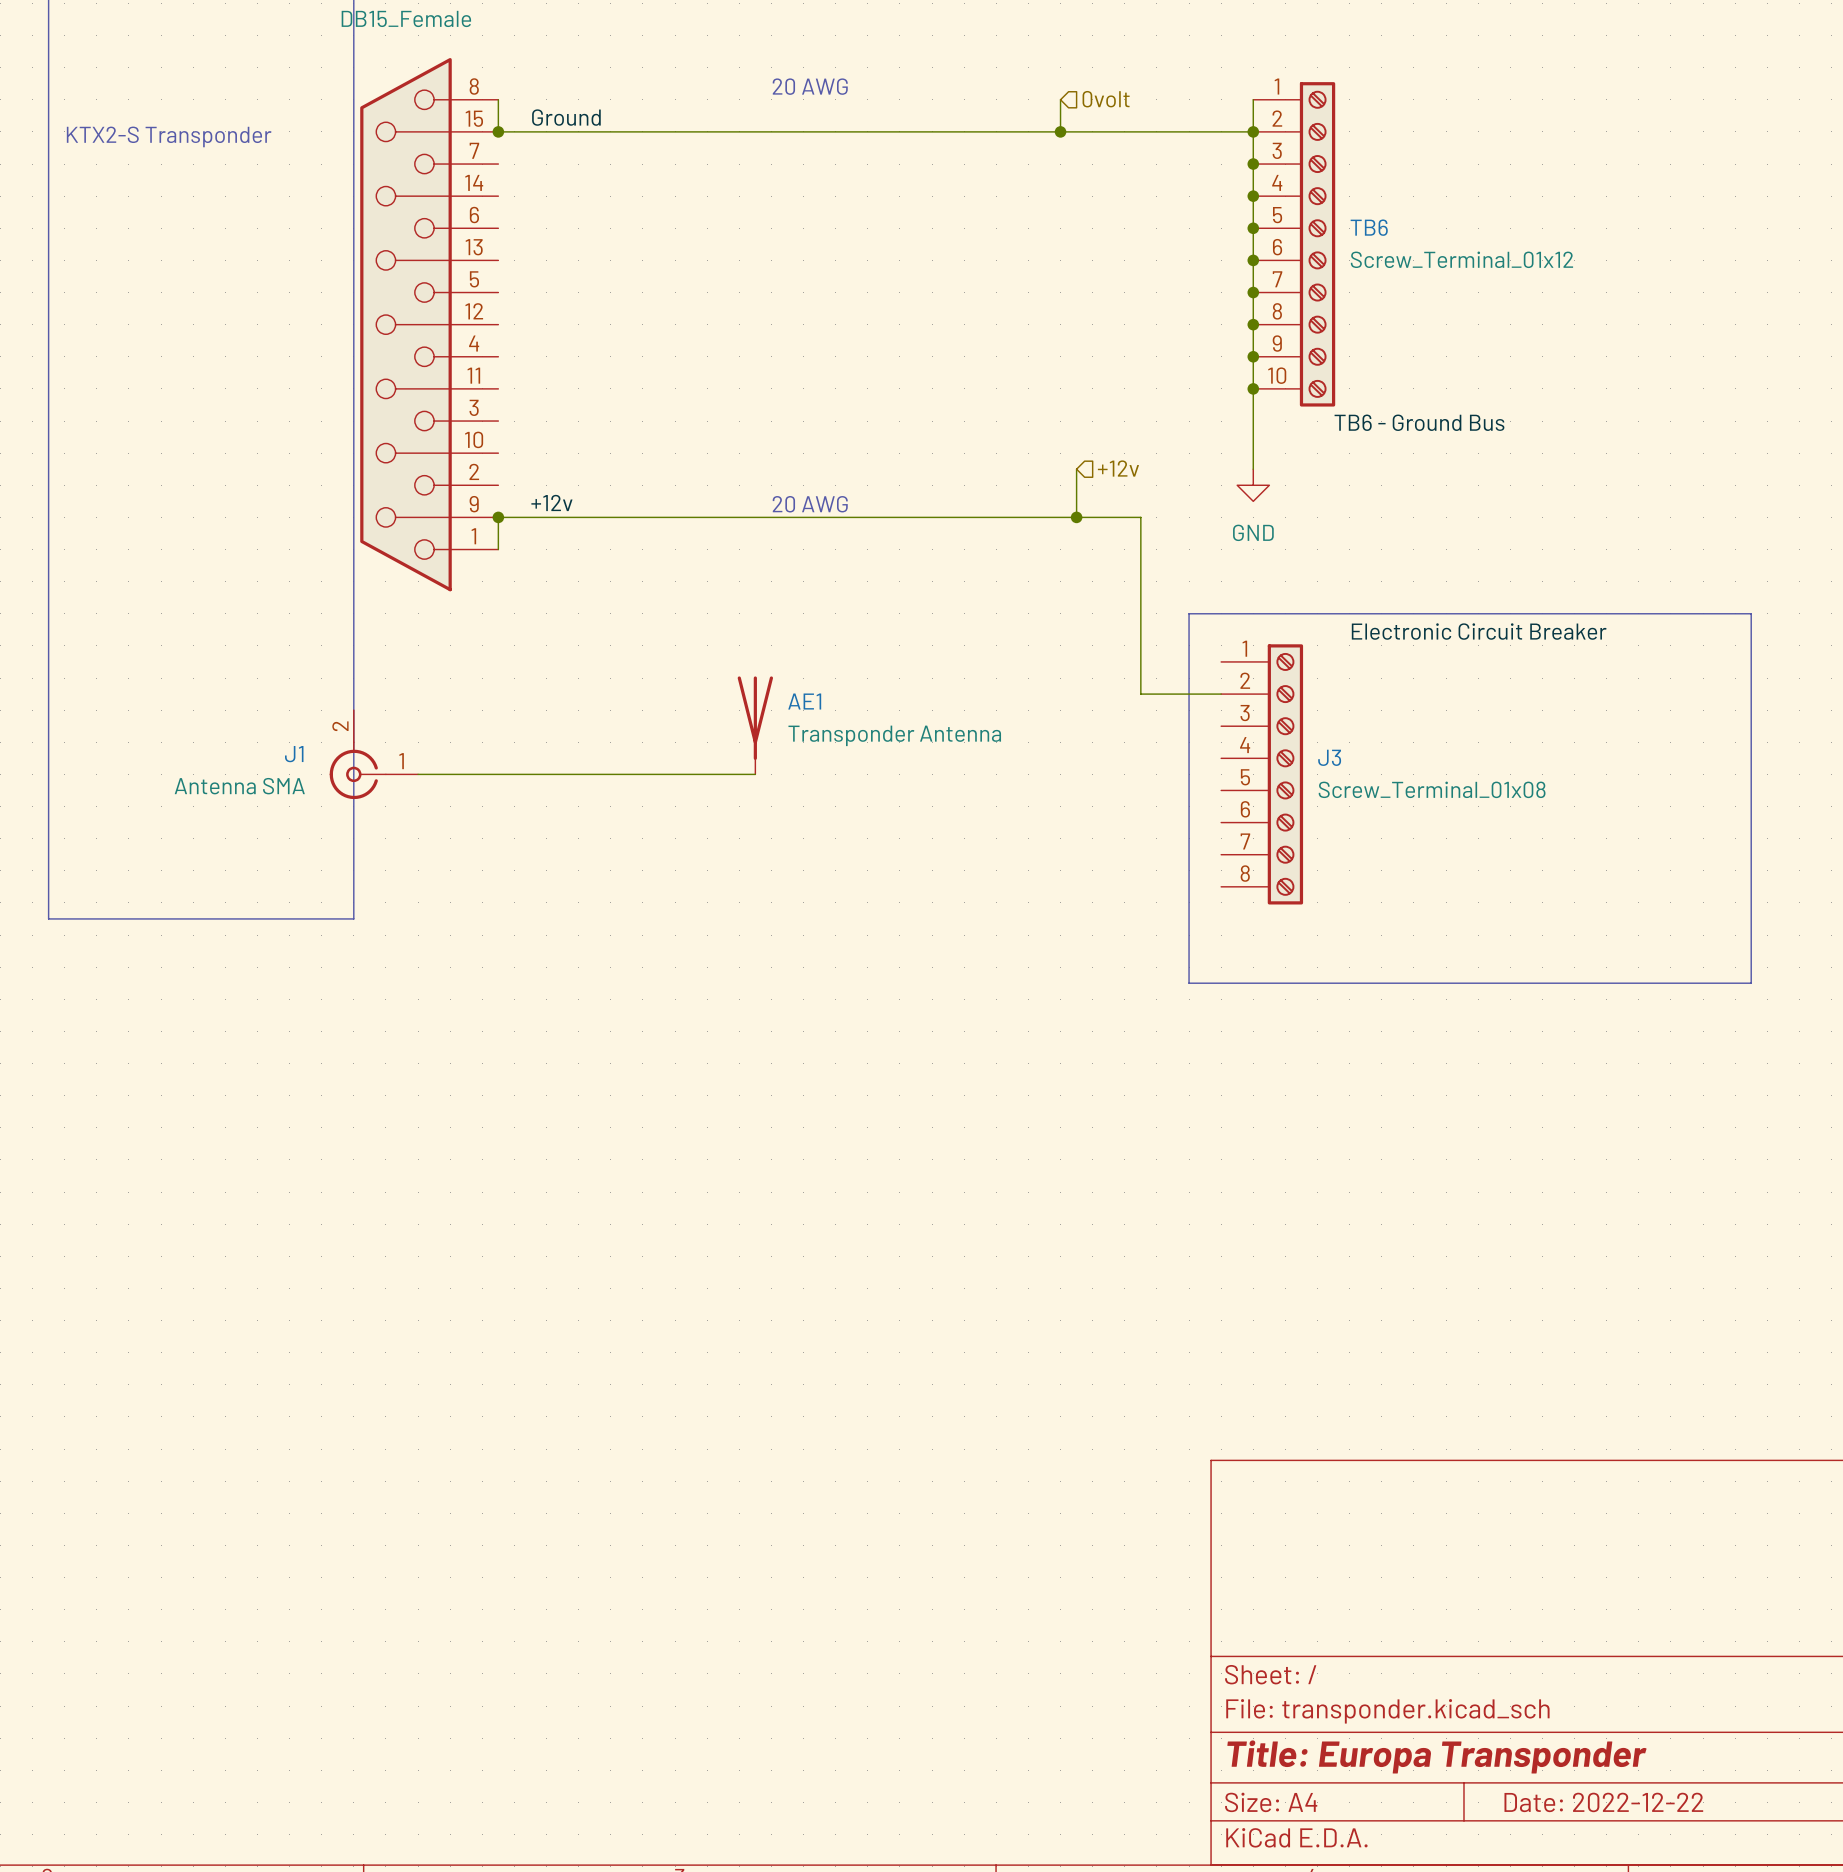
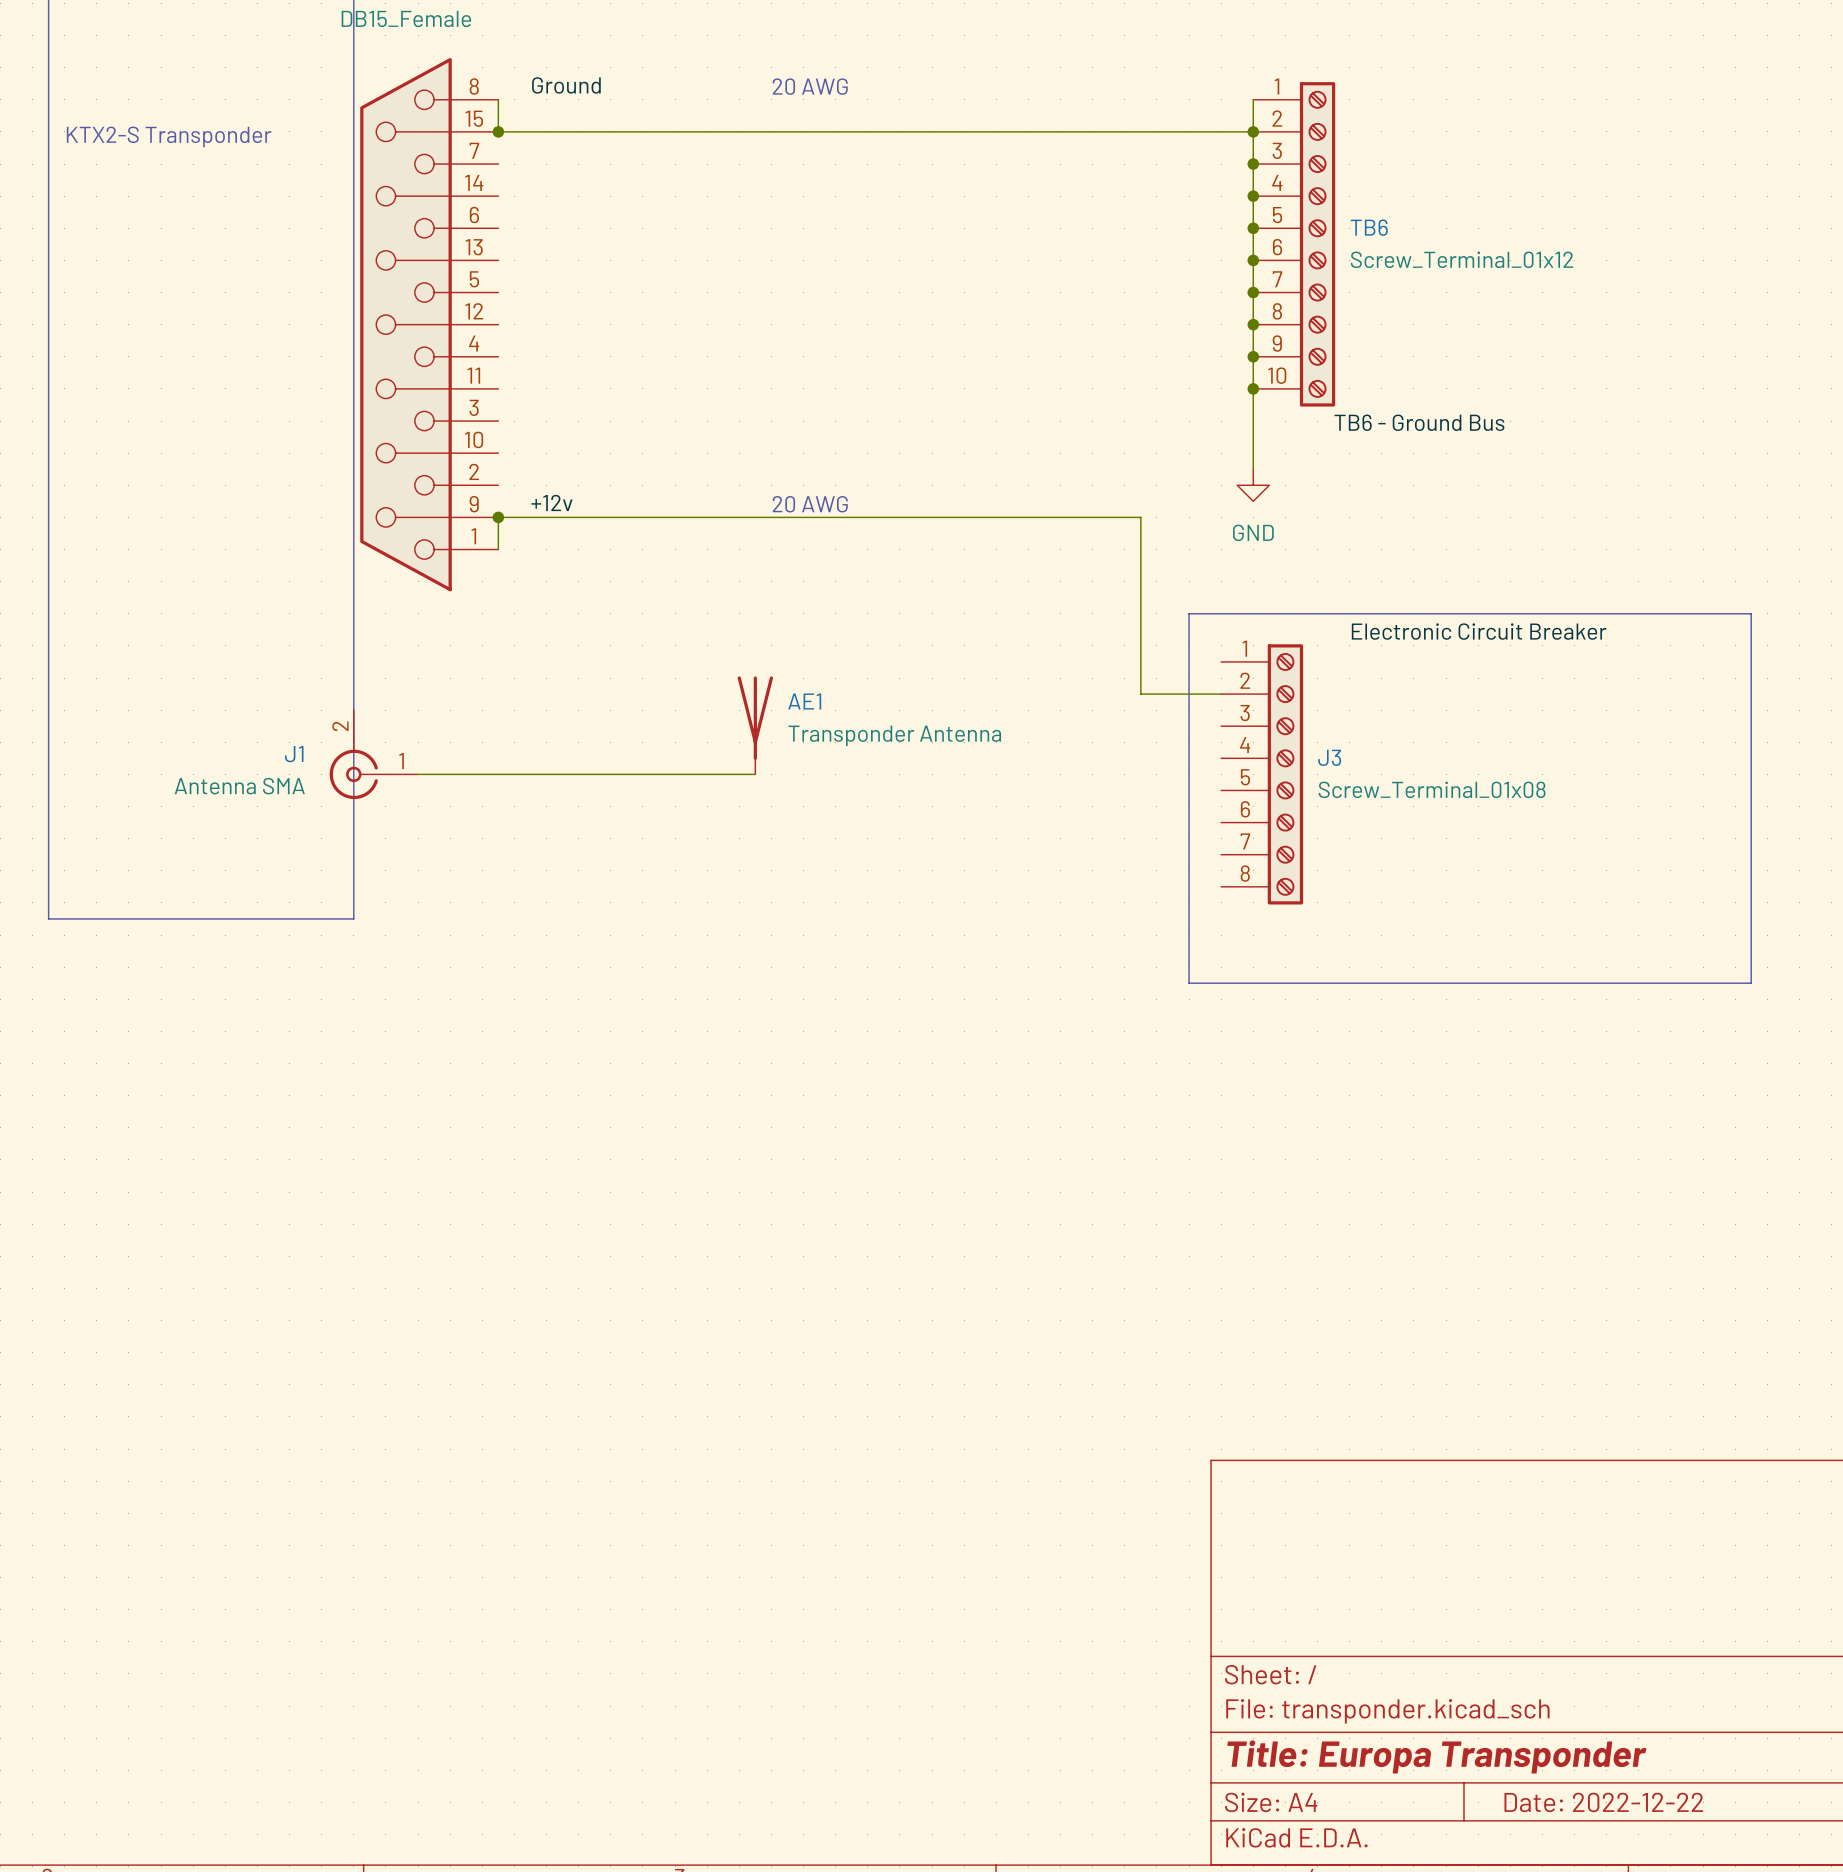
wire: (1060, 99) (1060, 131) -> none
hierarchical label: 0volt (1106, 99) -> none
label position: Ground (566, 117) -> Ground (566, 85)
junction: (1060, 131) -> none
hierarchical label: +12v (1118, 468) -> none
wire: (1076, 469) (1076, 517) -> none
junction: (1076, 517) -> none

